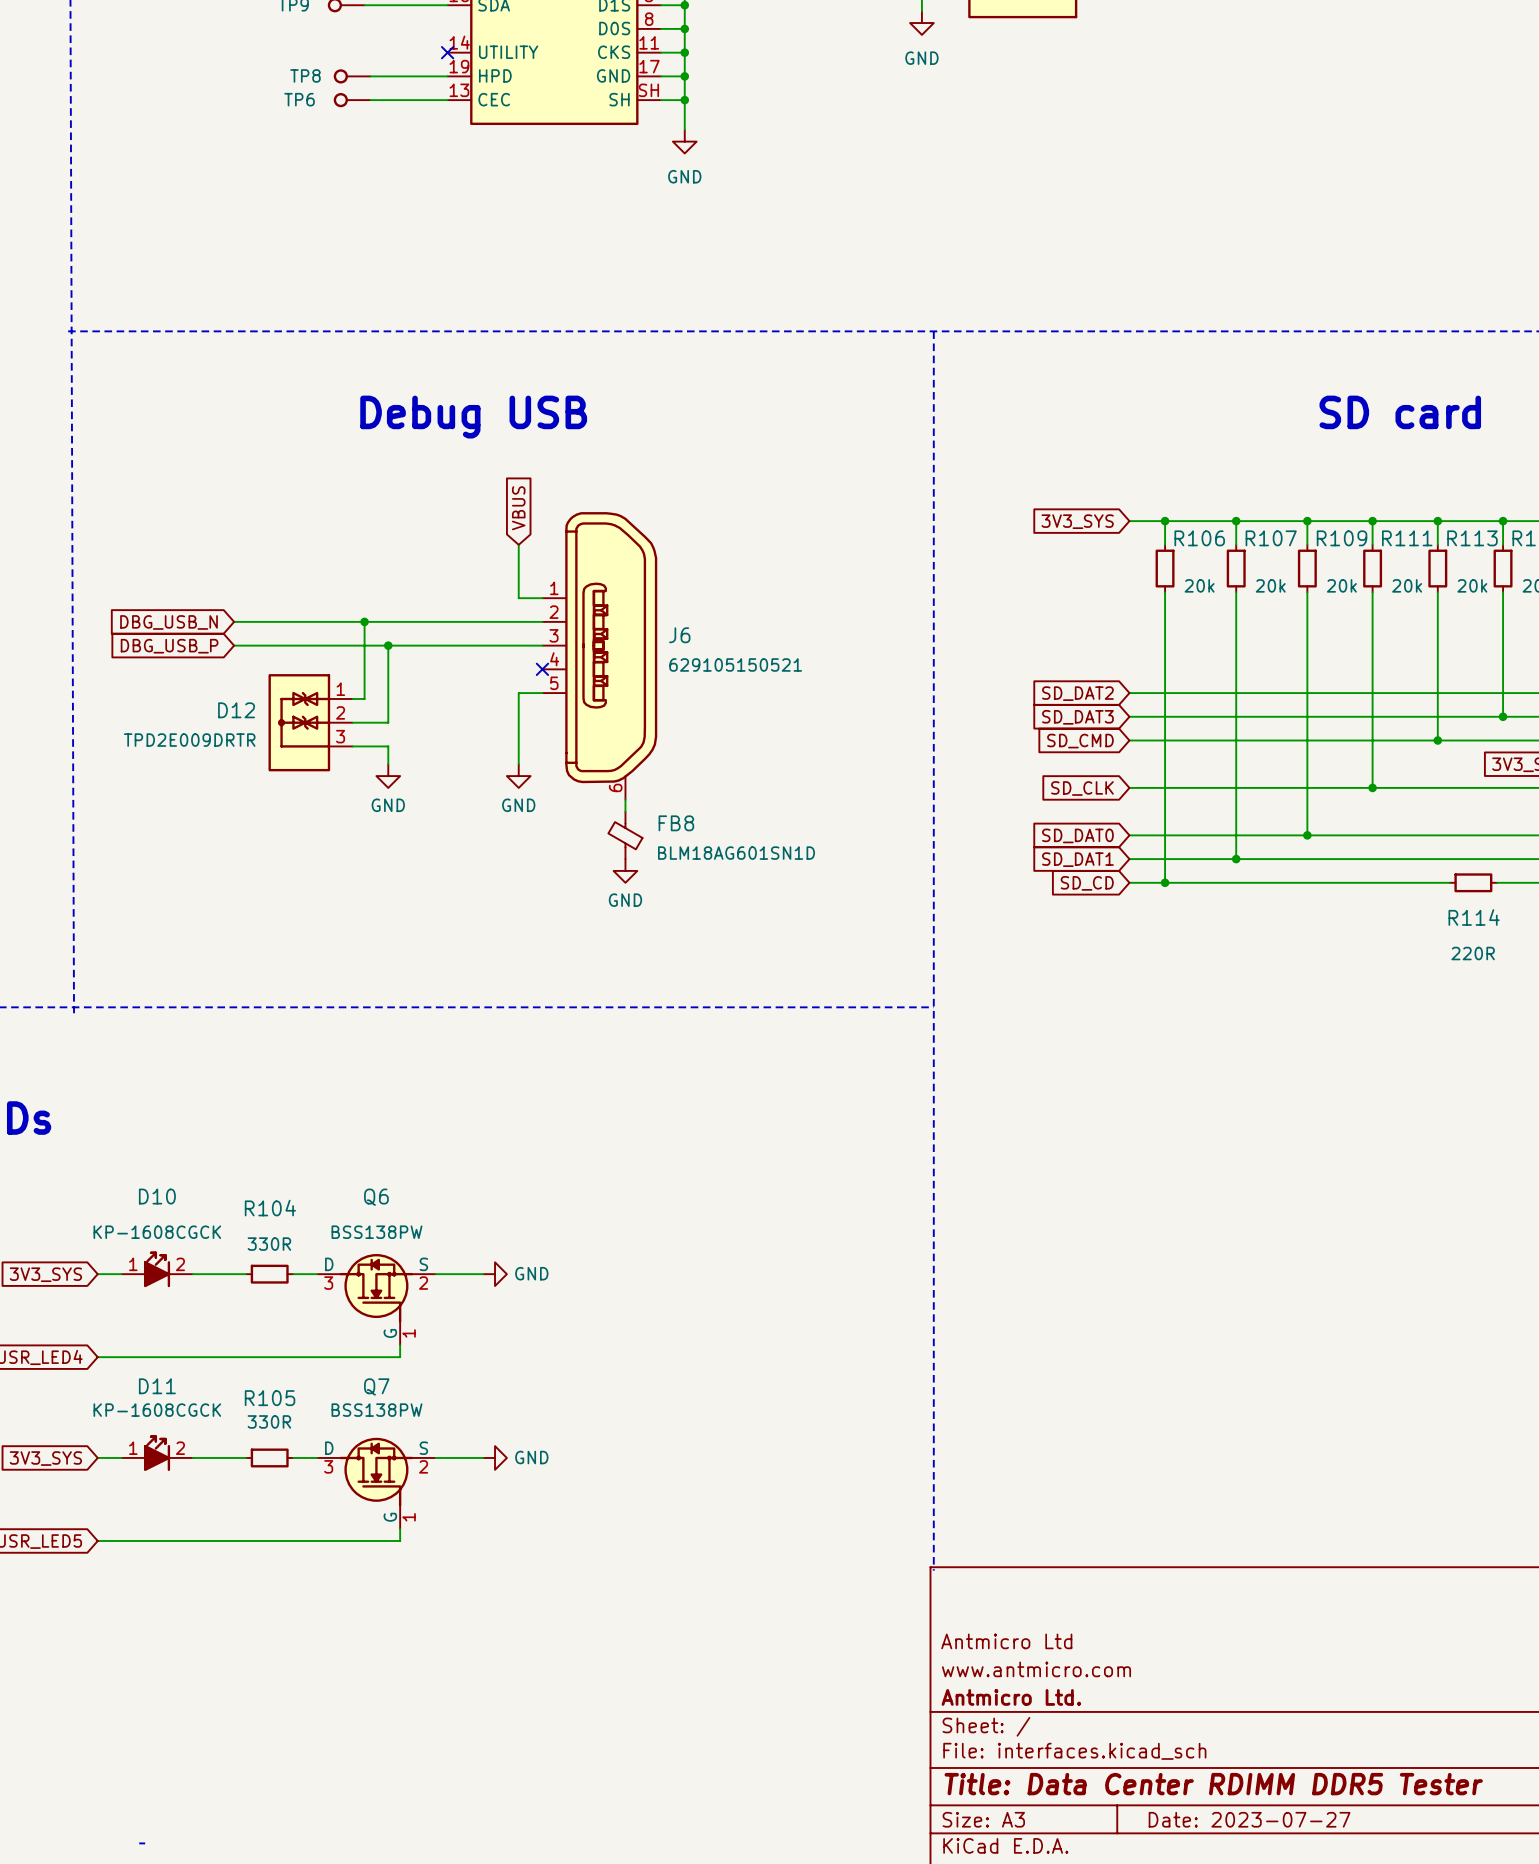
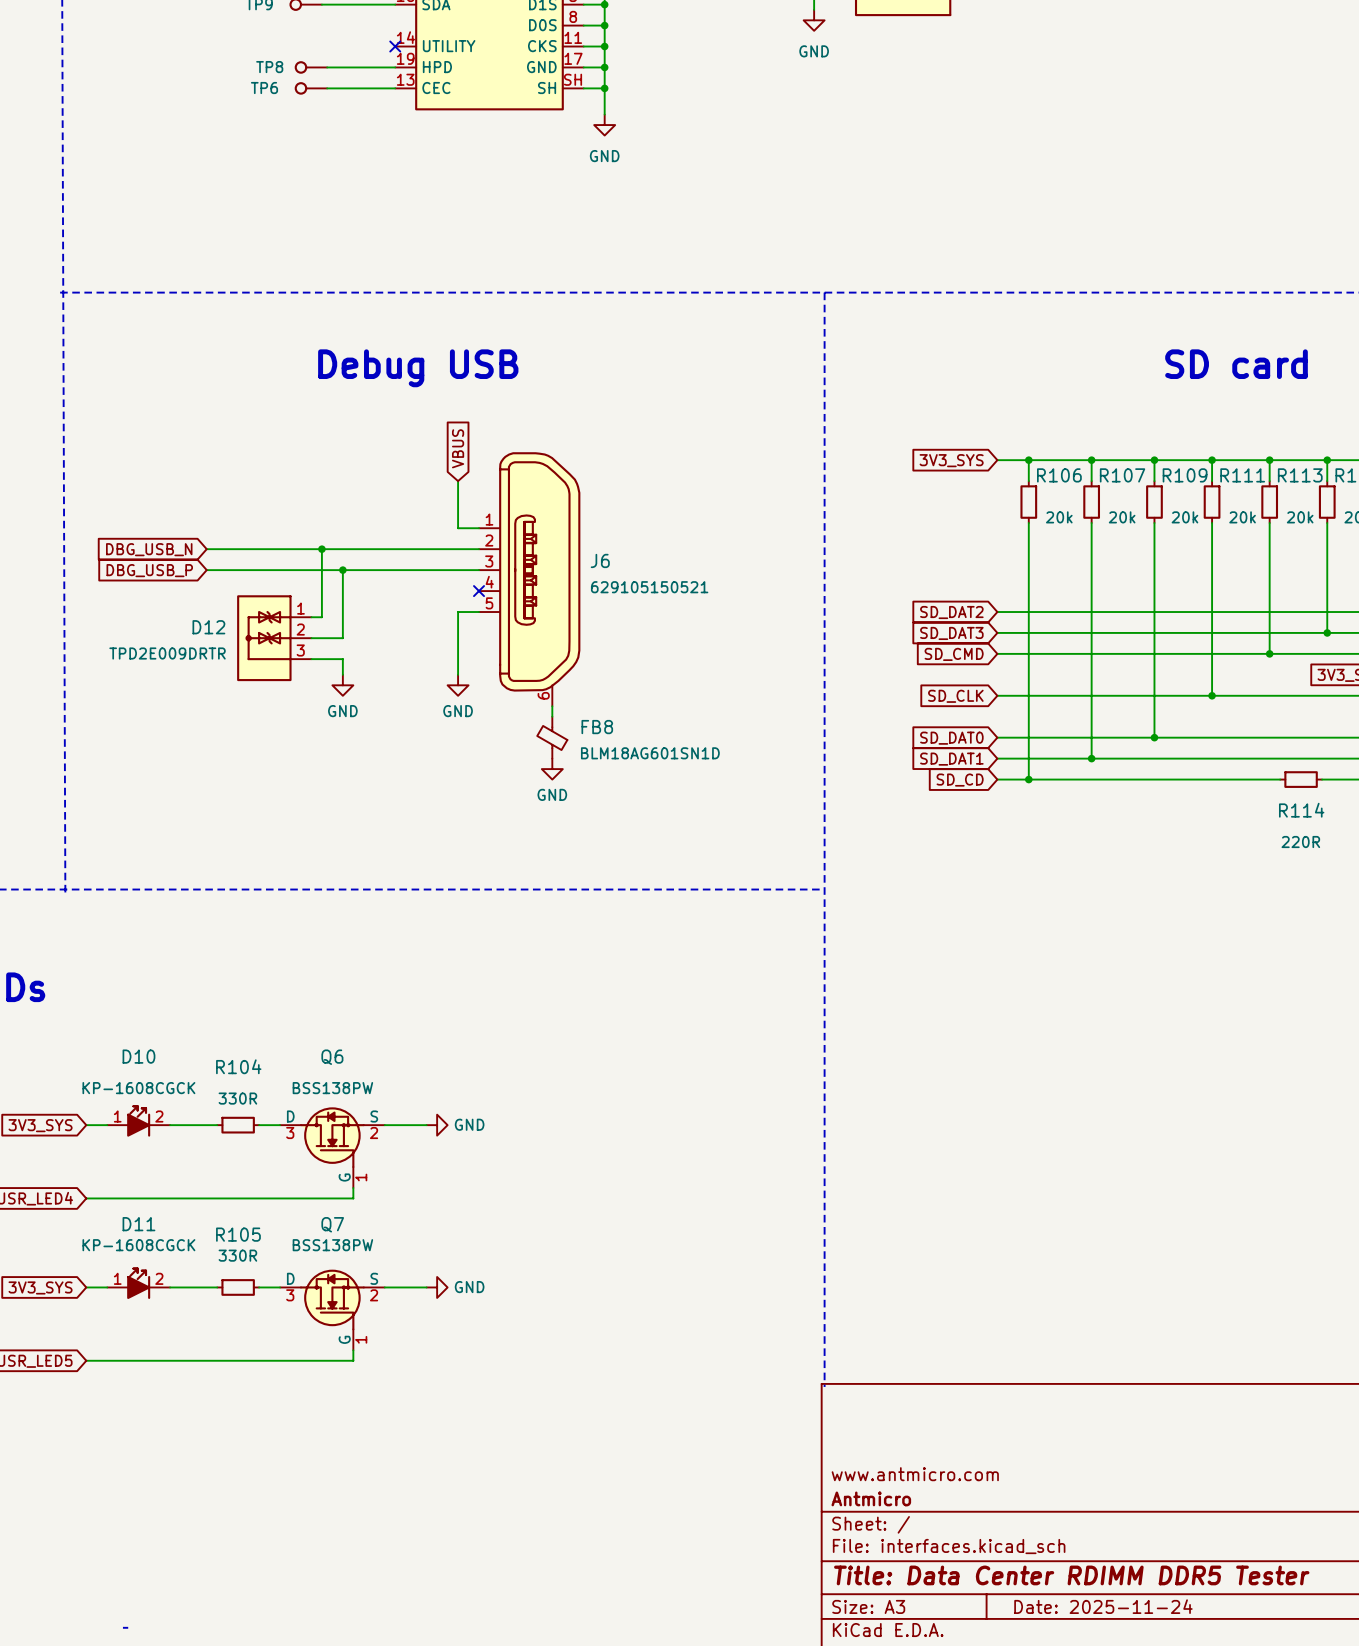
title block: Antmicro Ltd (1006, 1641) -> none
title block: Antmicro Ltd. (1011, 1697) -> Antmicro (871, 1498)
title block: Date: 2023-07-27 (1249, 1819) -> Date: 2025-11-24 (1103, 1606)

